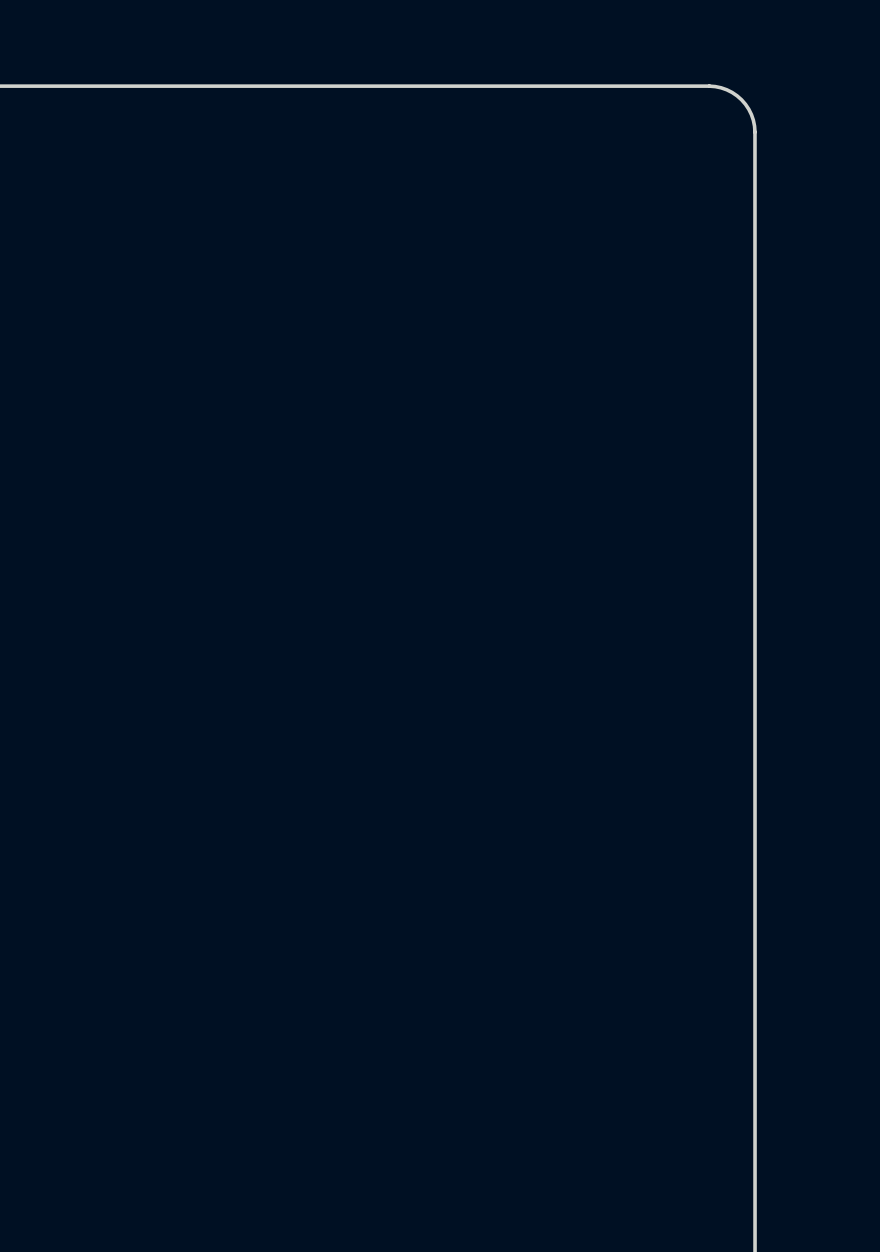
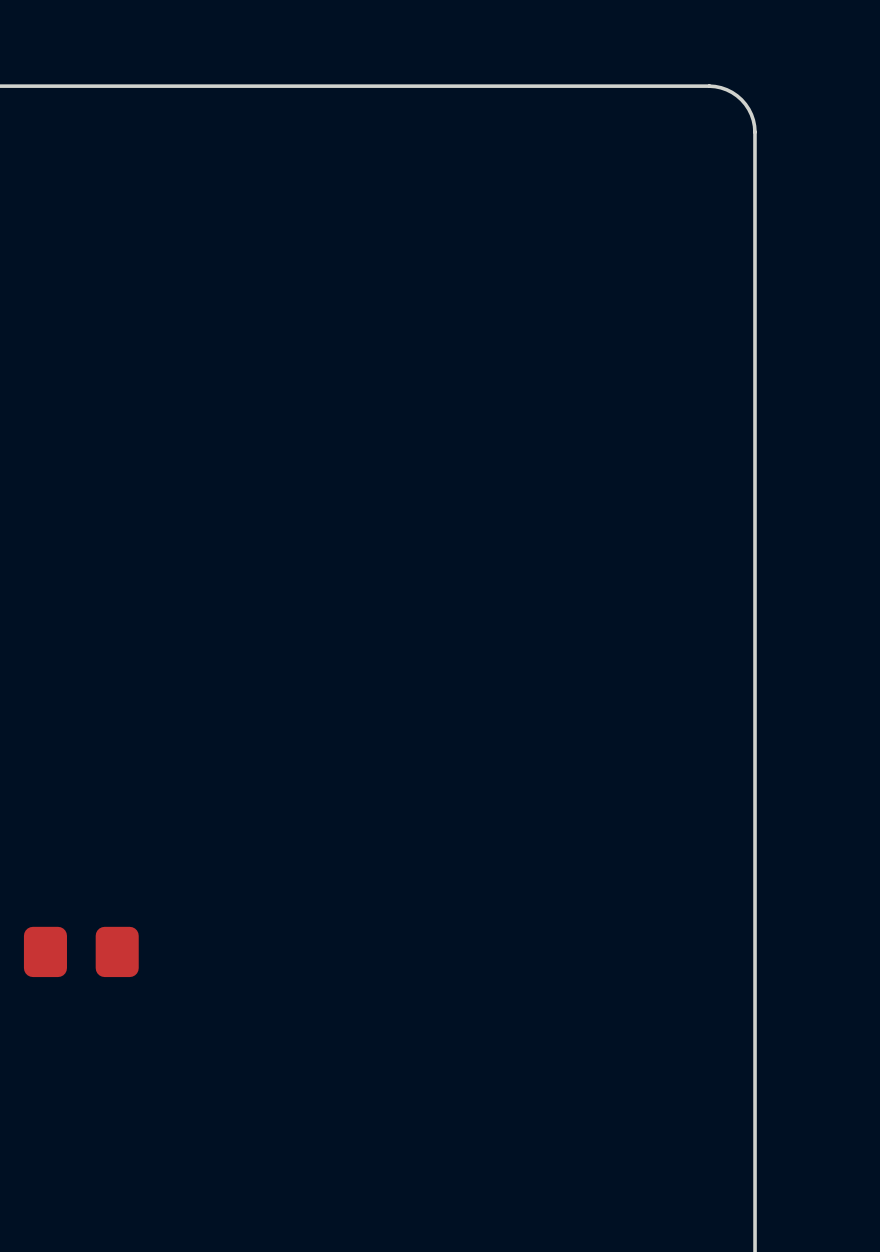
part: none -> (81, 951)

